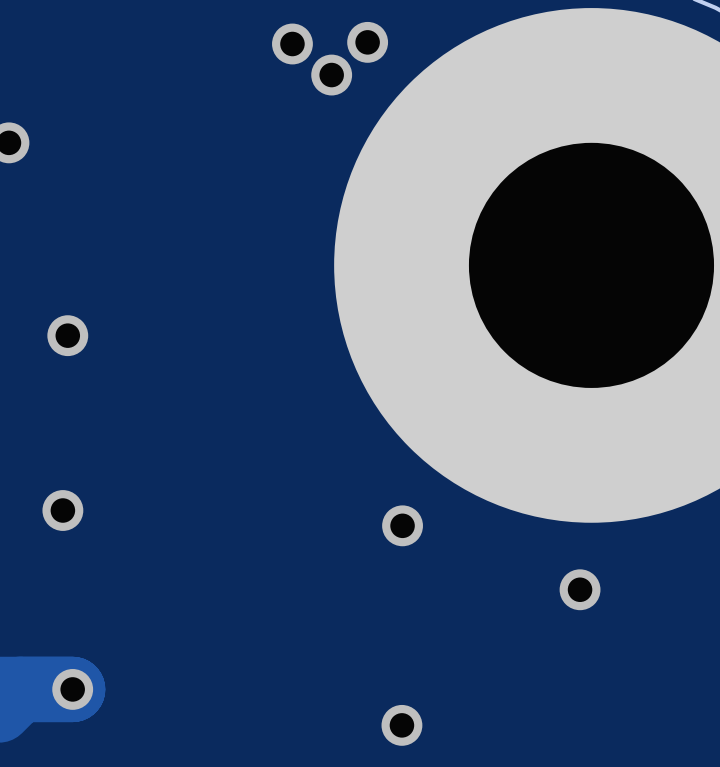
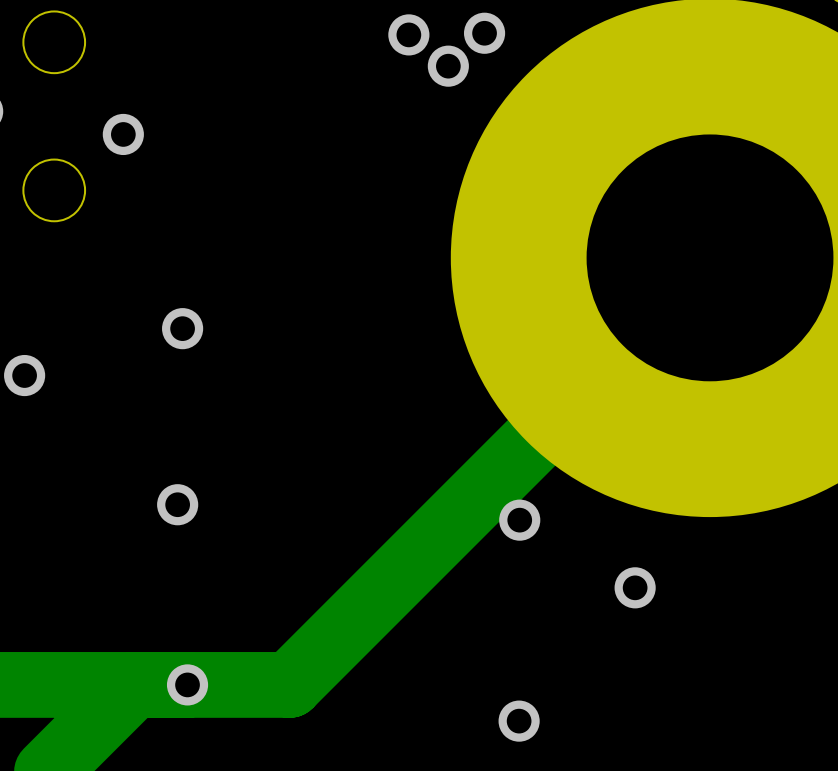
track: none -> (714, 260) (289, 684) (187, 684)
via position: (580, 589) -> (635, 587)

